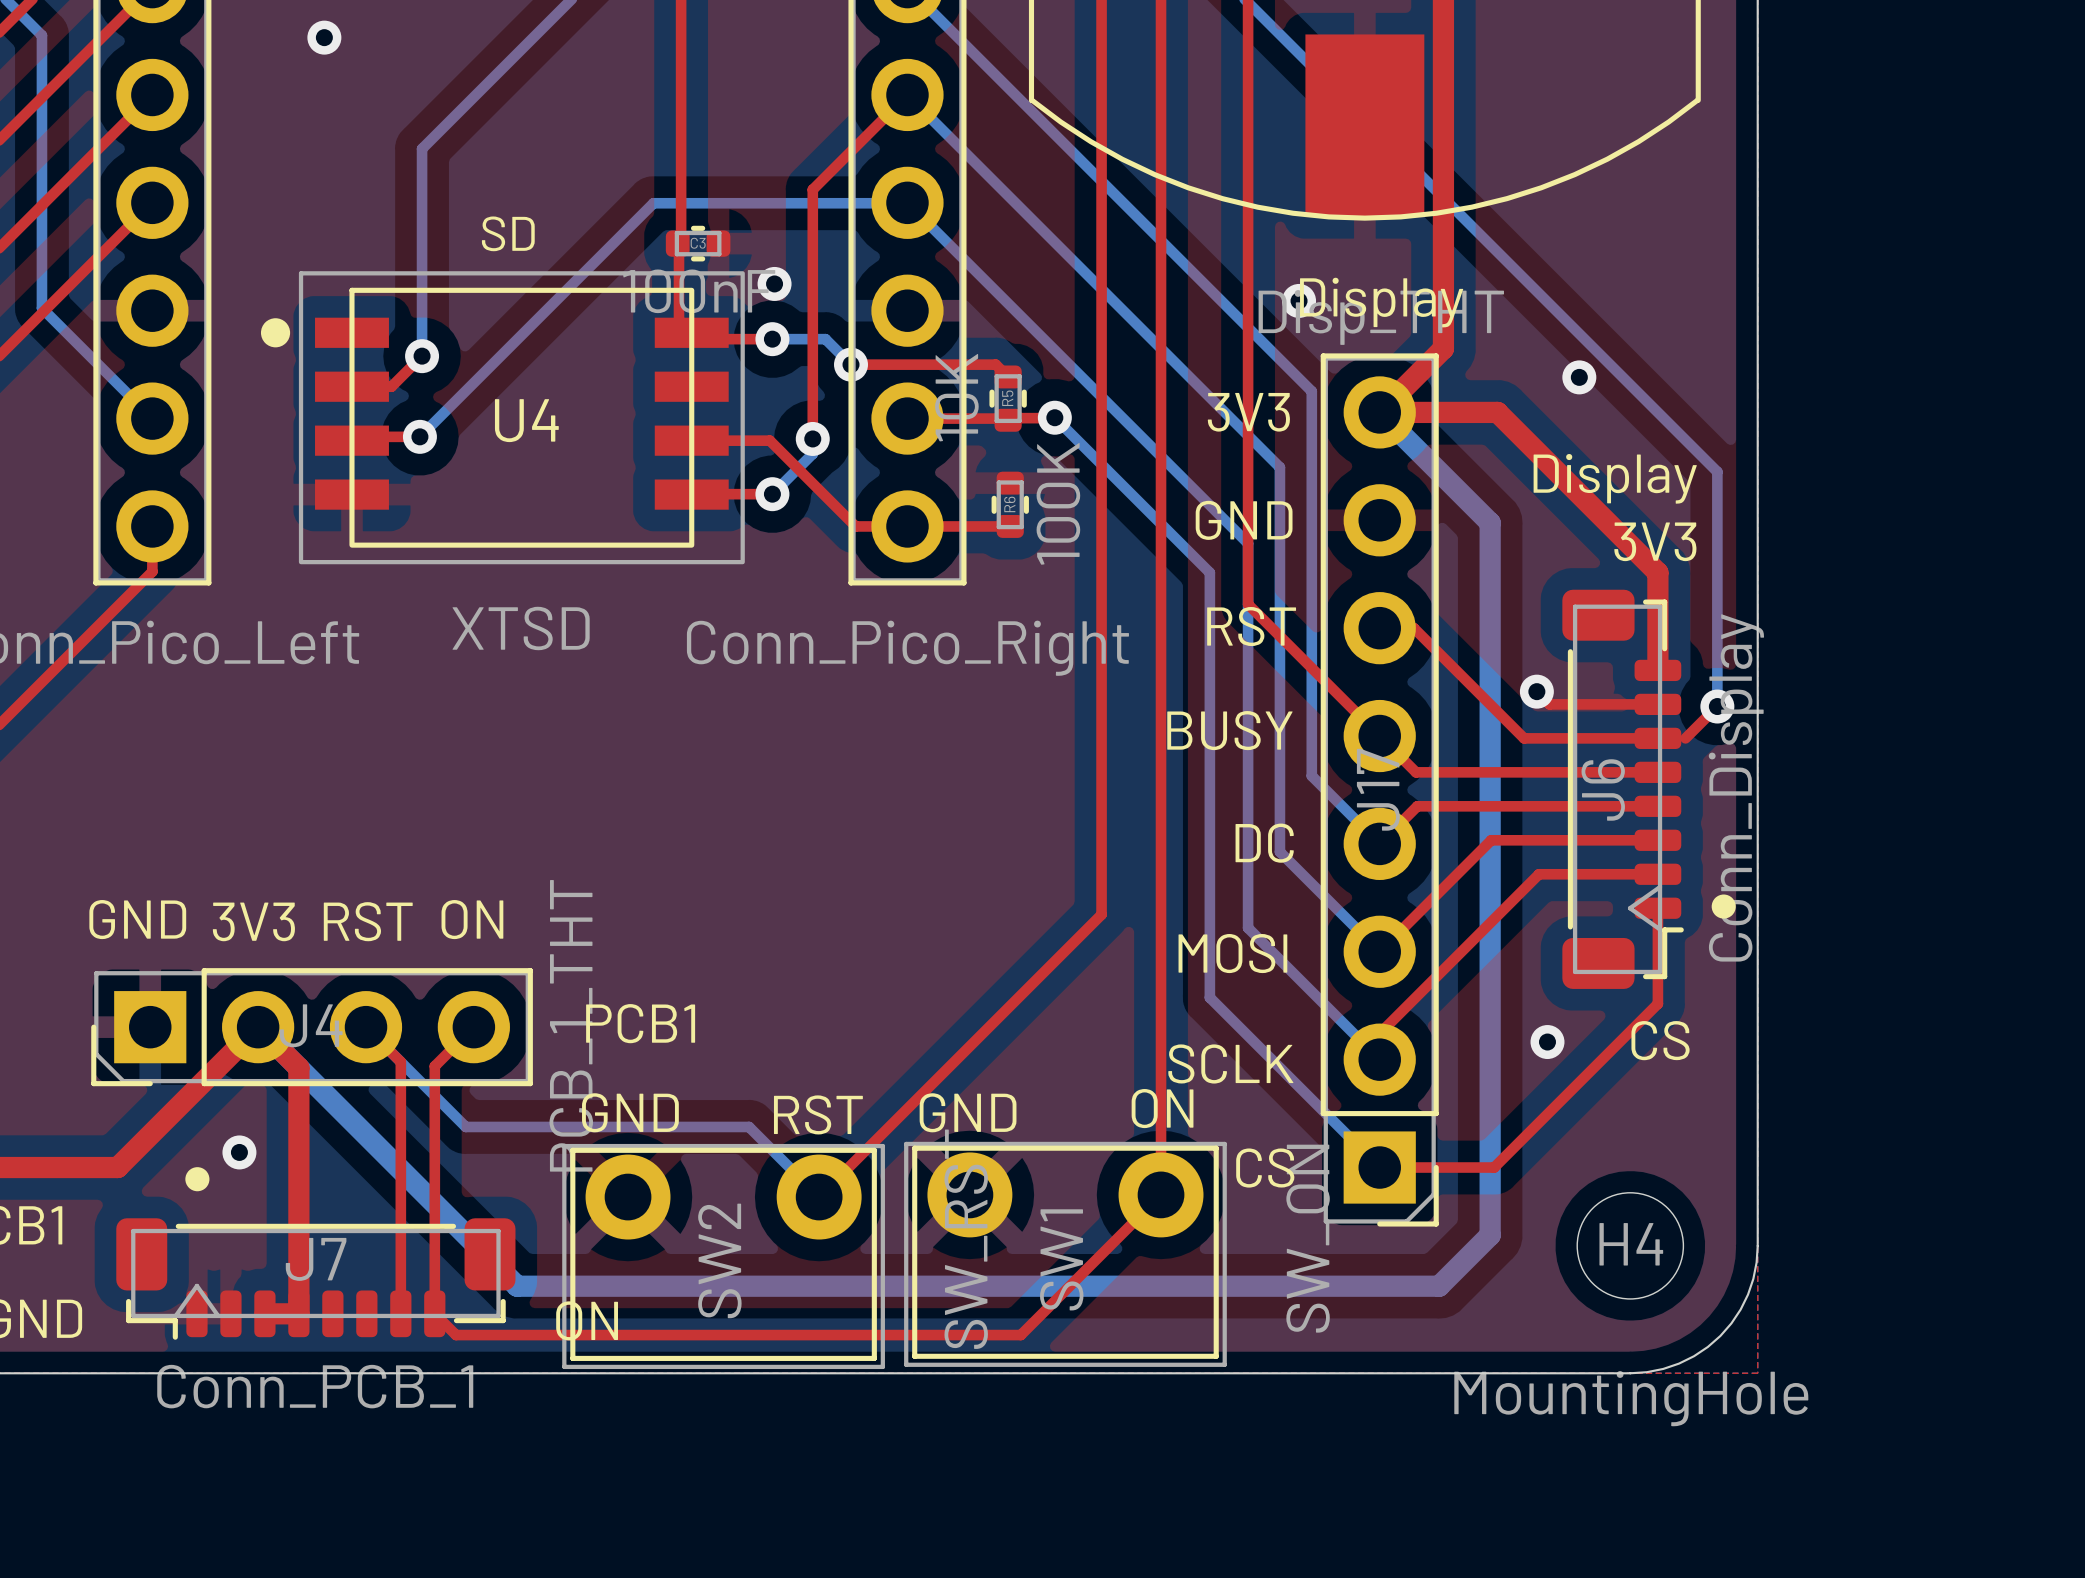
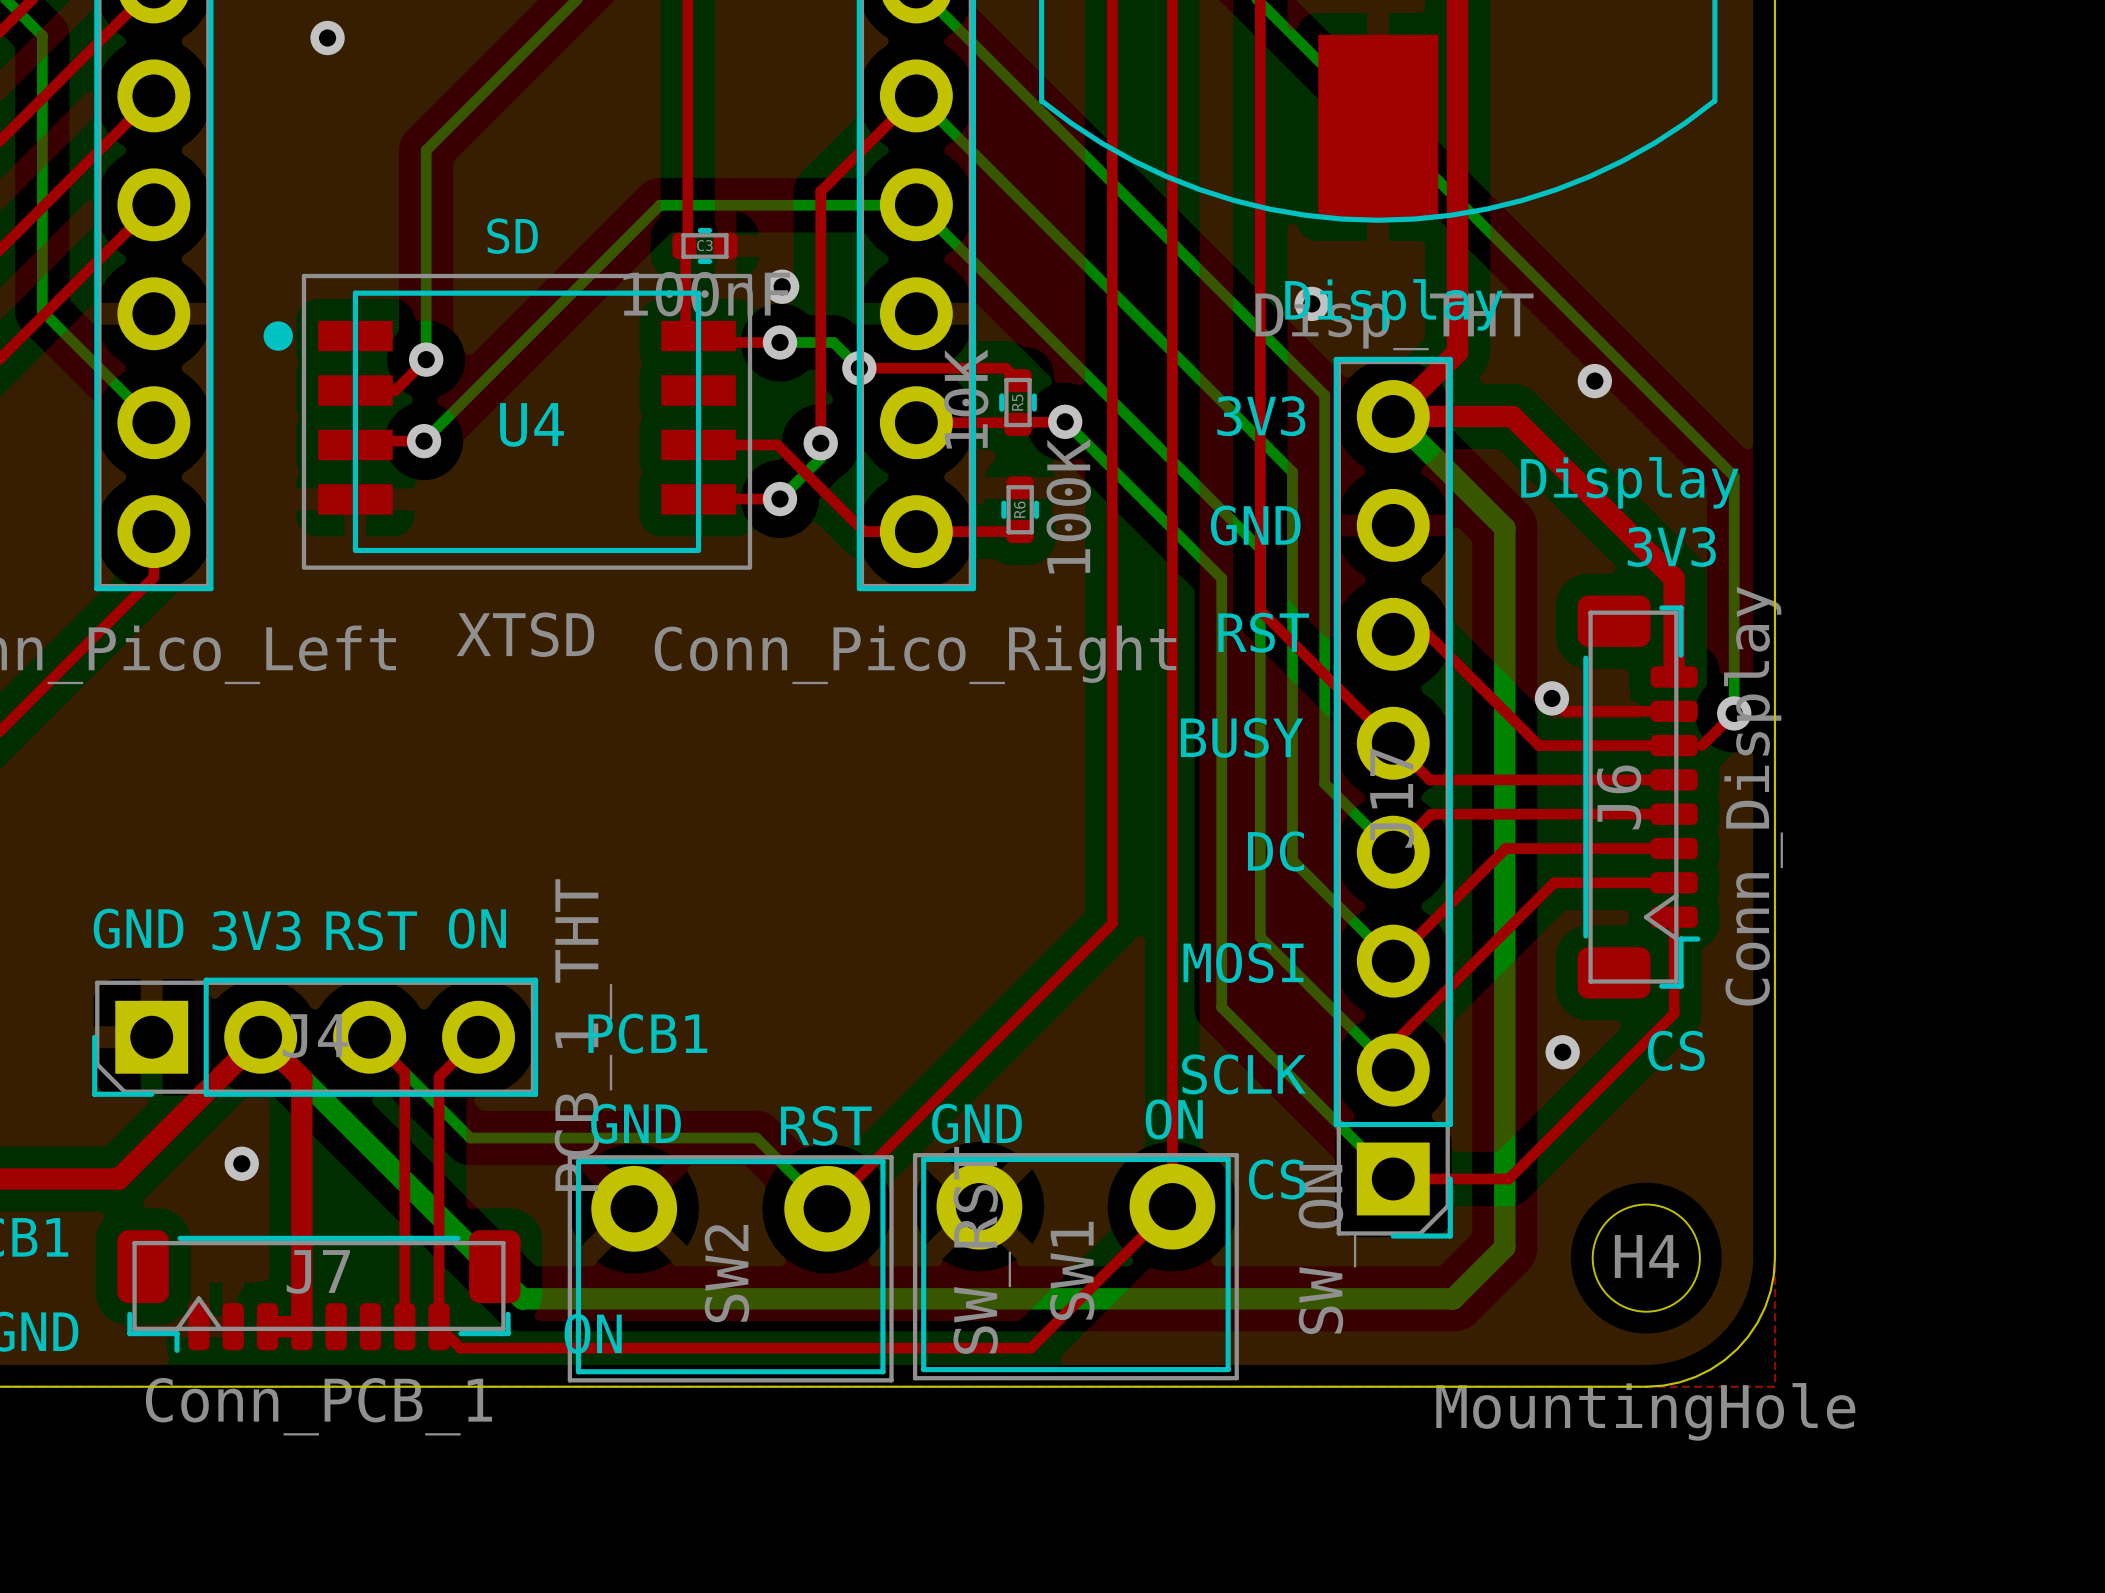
drawing: [1711, 894, 1736, 919] -> none
drawing: [185, 1167, 210, 1192] -> none

